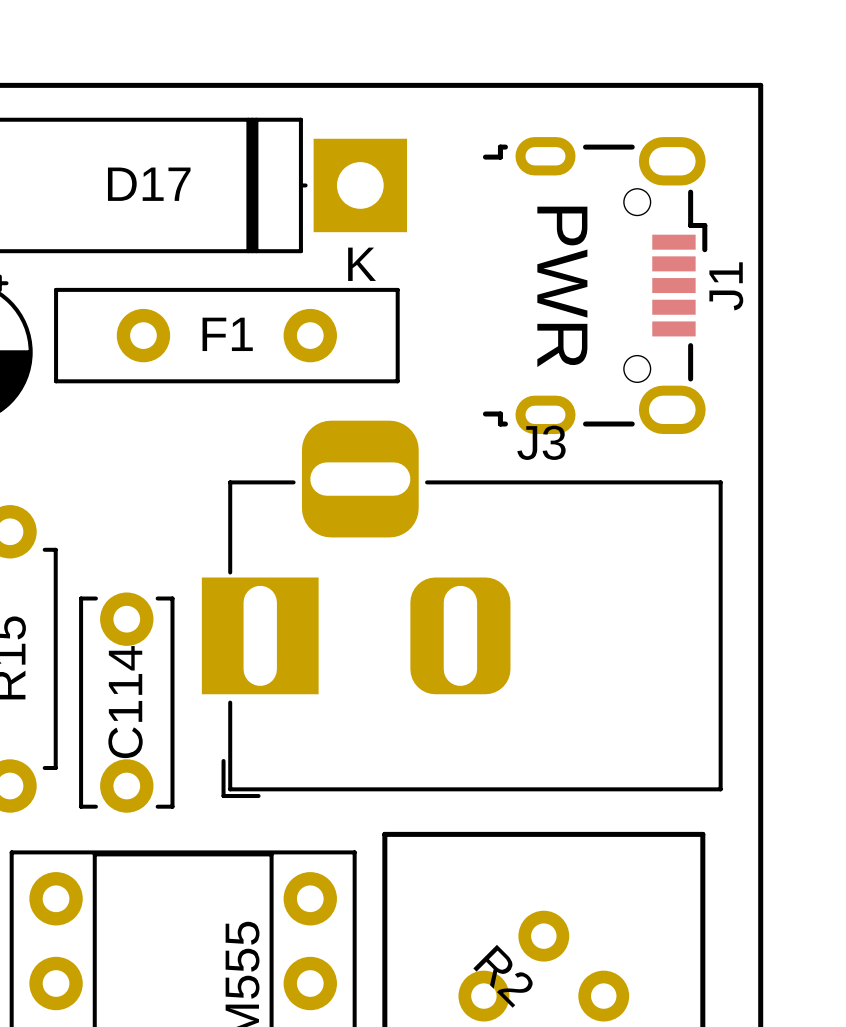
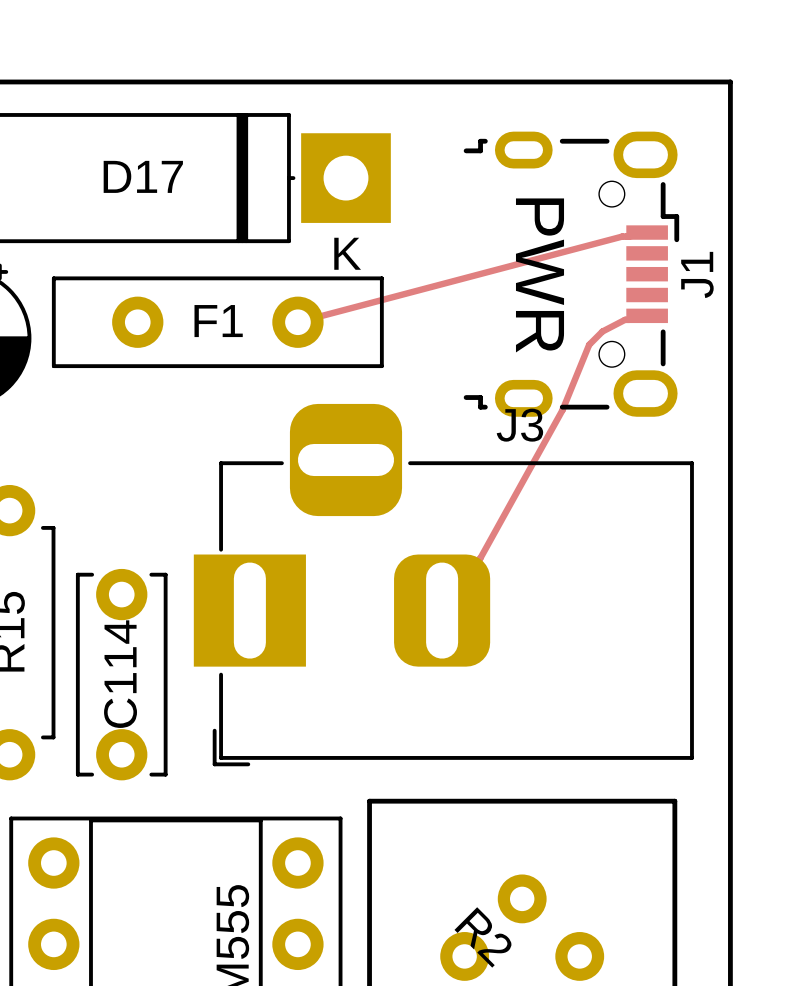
track: none -> (647, 232) (622, 236) (297, 322)
track: none -> (647, 315) (624, 319) (602, 331) (589, 344) (562, 410) (480, 558)

